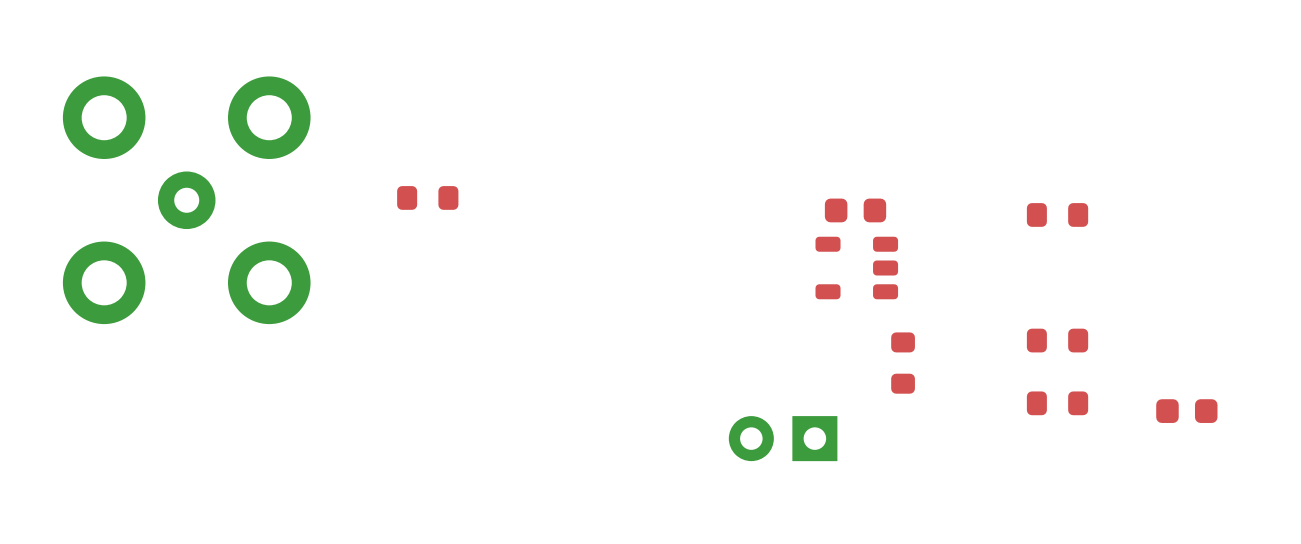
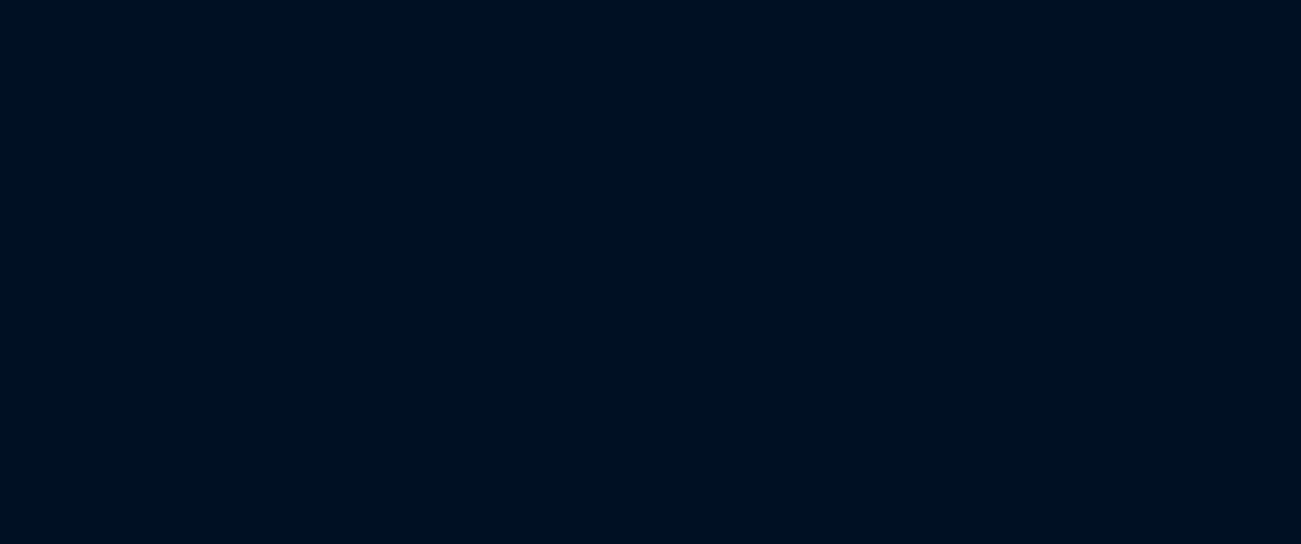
part: (427, 197) -> none
part: (186, 200) -> none
part: (855, 210) -> none
part: (1057, 214) -> none
part: (856, 268) -> none
part: (1057, 340) -> none
part: (903, 363) -> none
part: (1057, 403) -> none
part: (1186, 411) -> none
part: (783, 438) -> none

